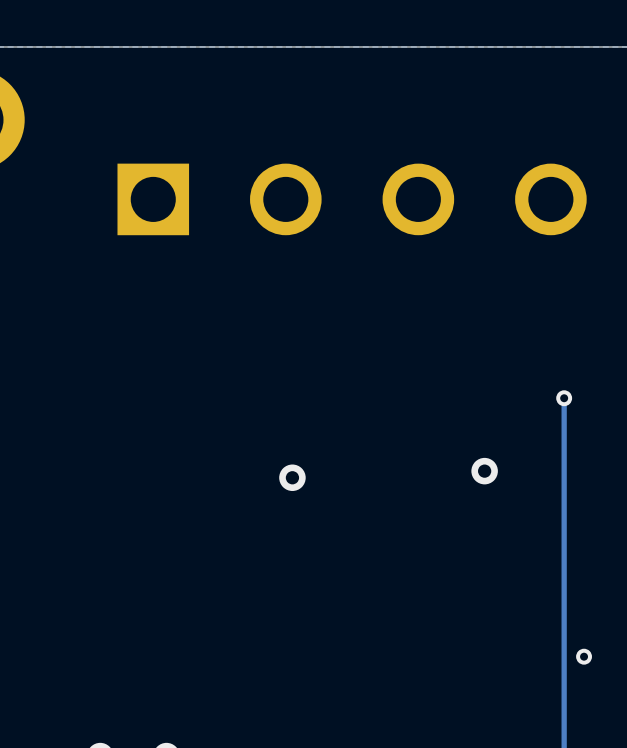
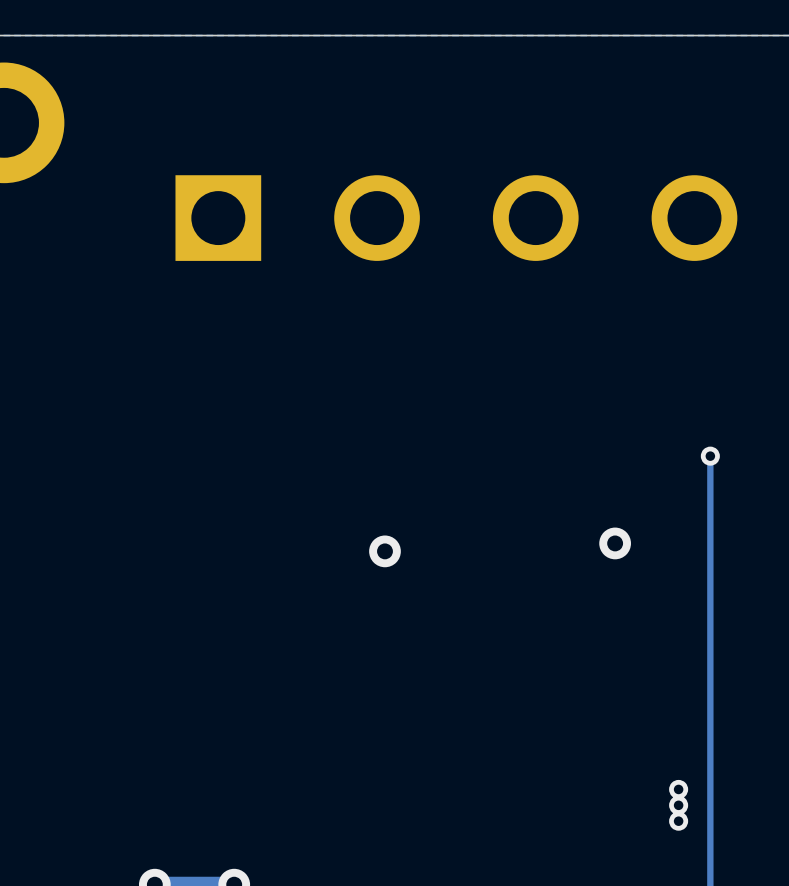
via: (584, 656) -> none
via: none -> (678, 789)
via: none -> (678, 805)
via: none -> (678, 821)

